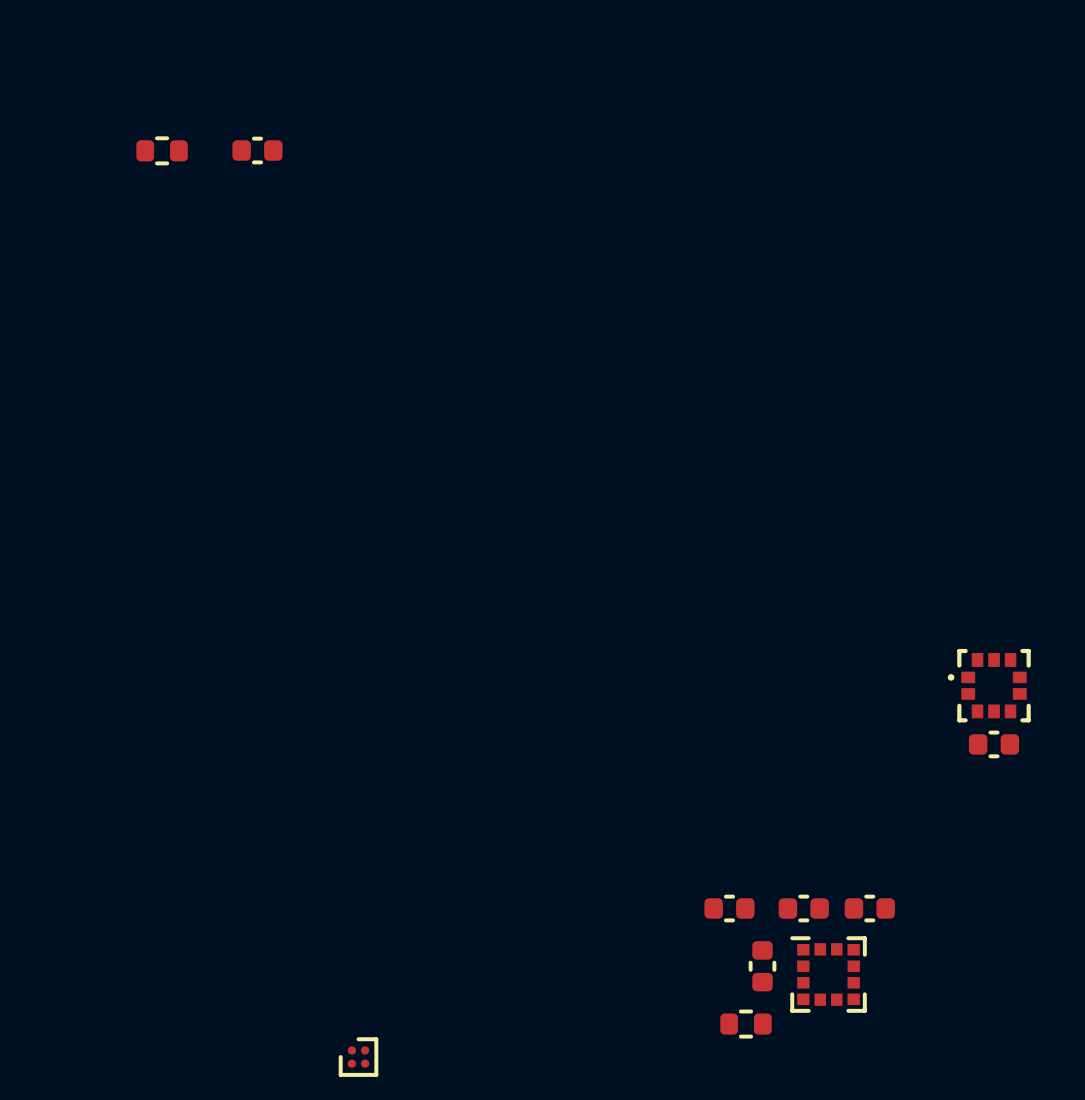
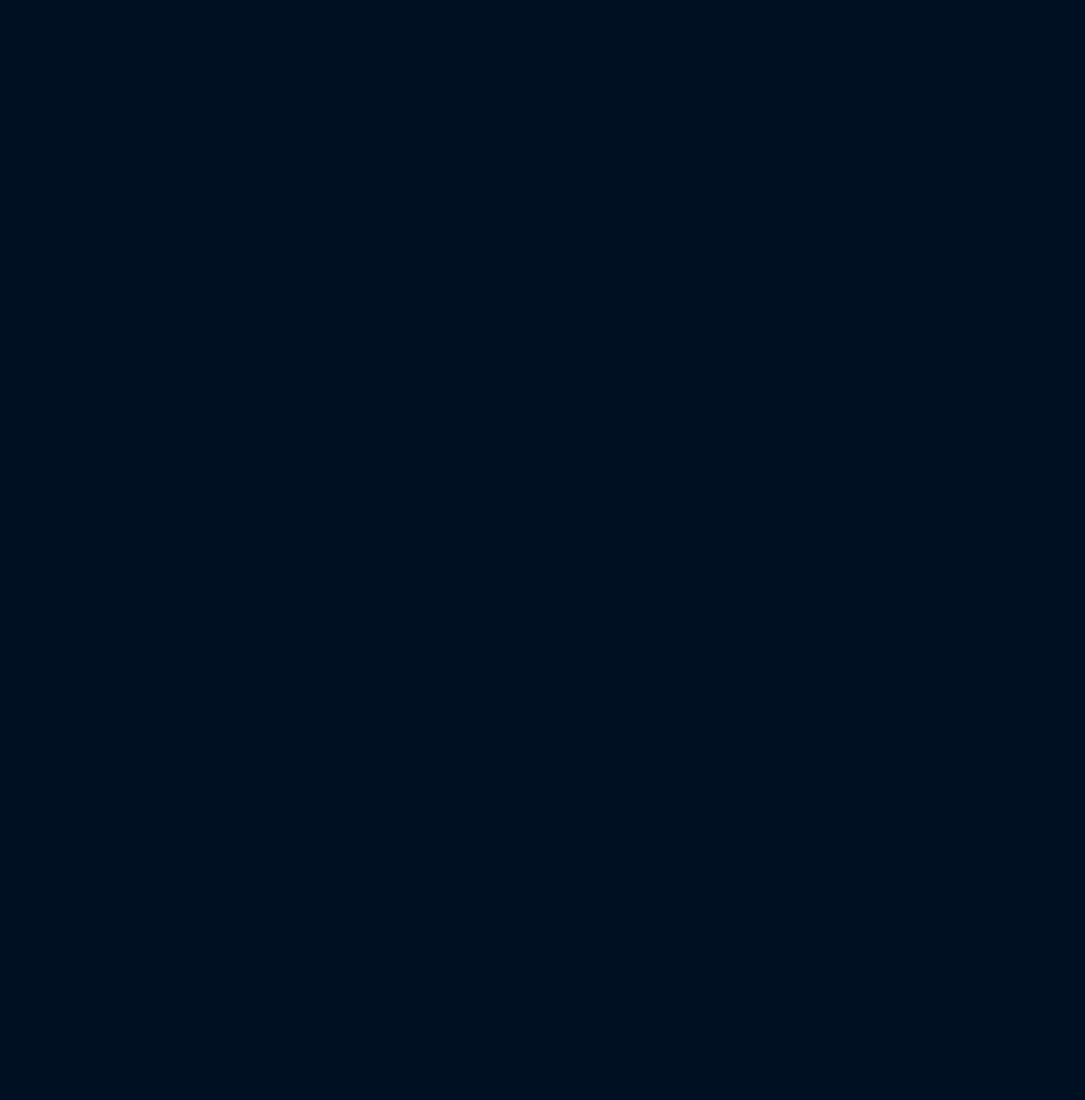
part: (162, 150) -> none
part: (257, 150) -> none
part: (989, 685) -> none
part: (994, 744) -> none
part: (729, 908) -> none
part: (803, 908) -> none
part: (869, 908) -> none
part: (762, 966) -> none
part: (828, 974) -> none
part: (745, 1024) -> none
part: (358, 1057) -> none

